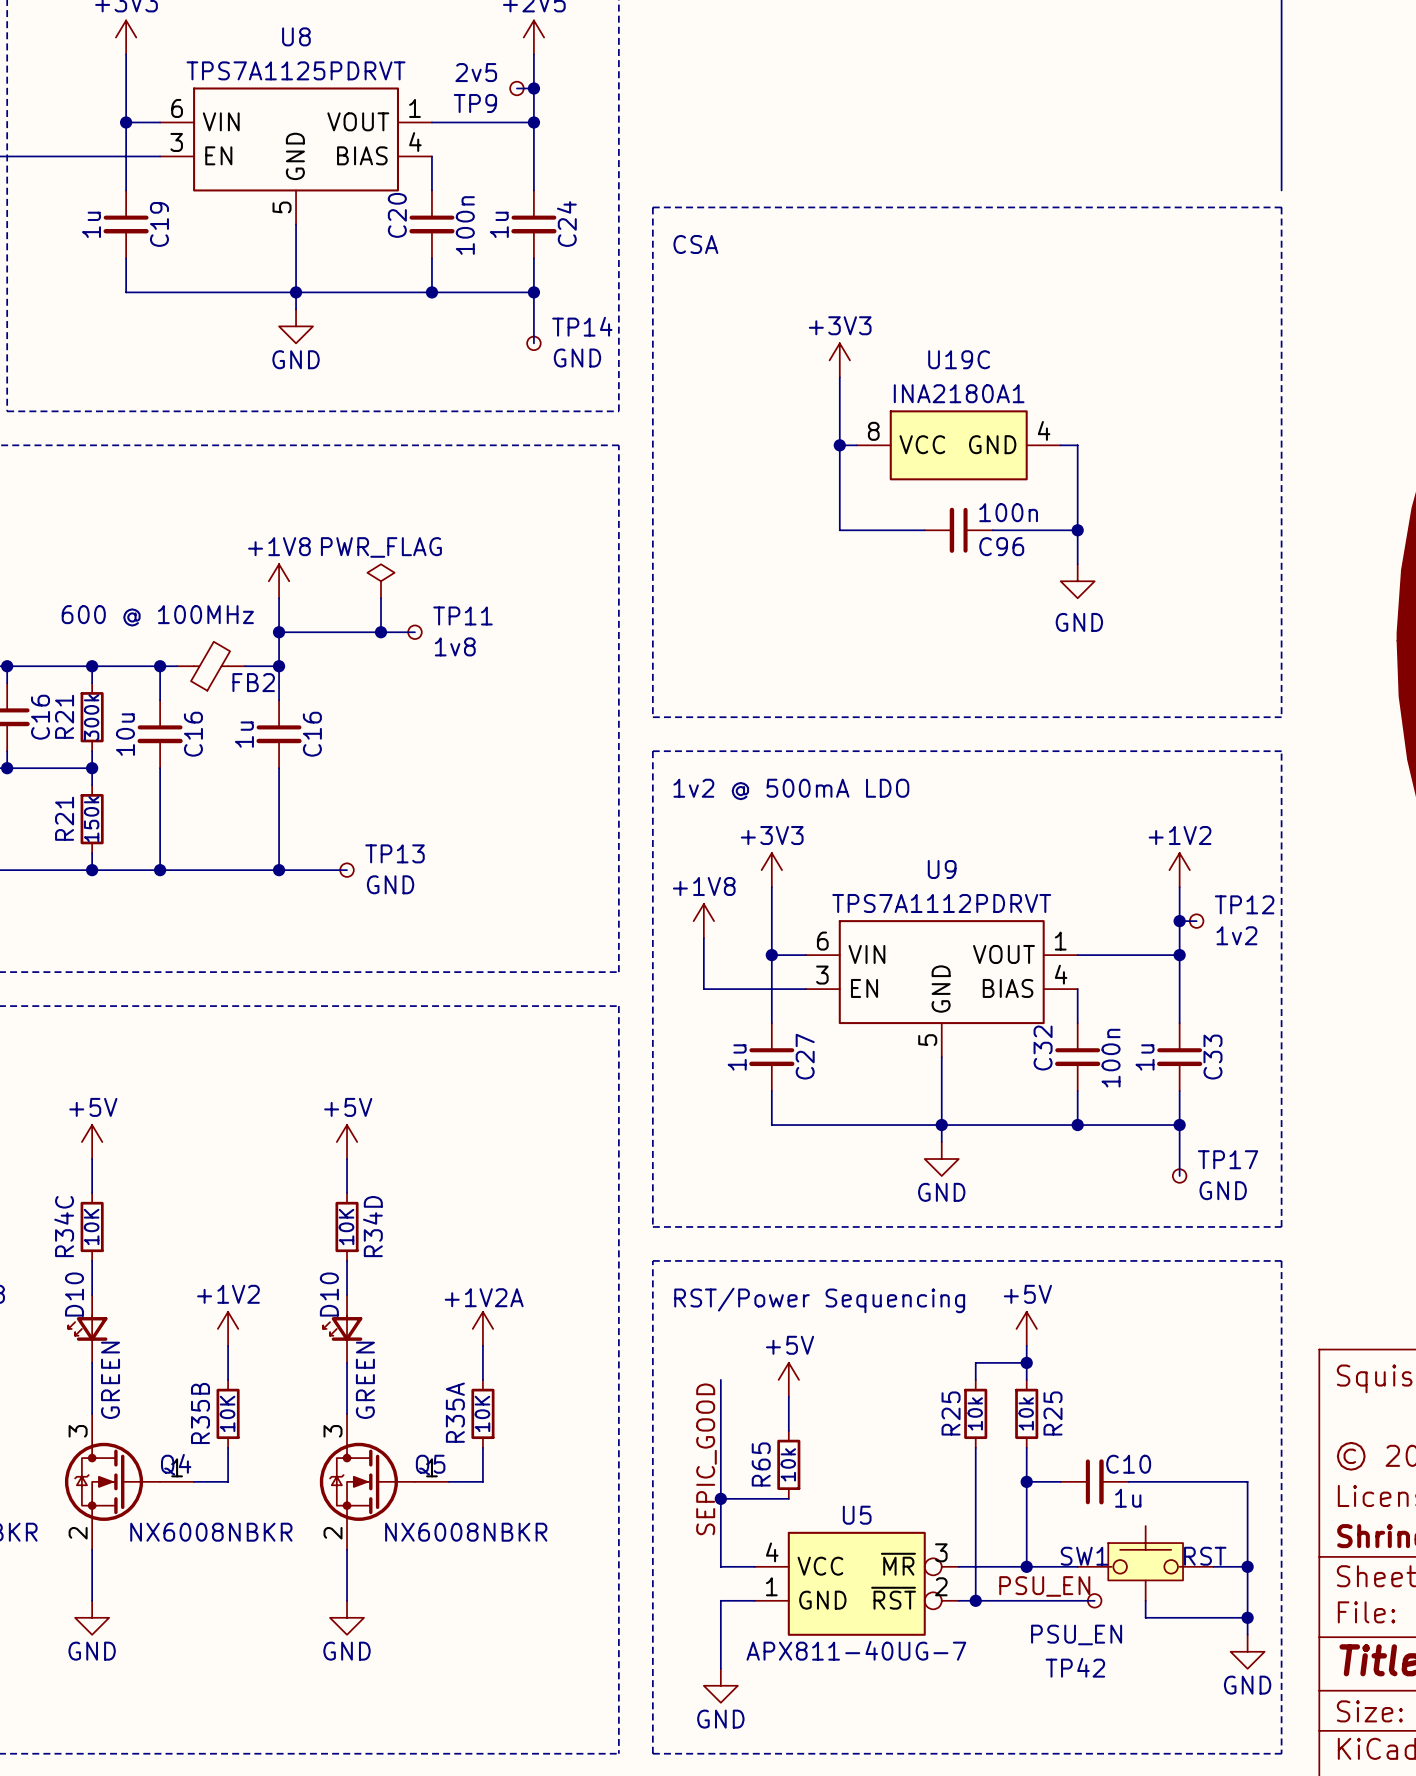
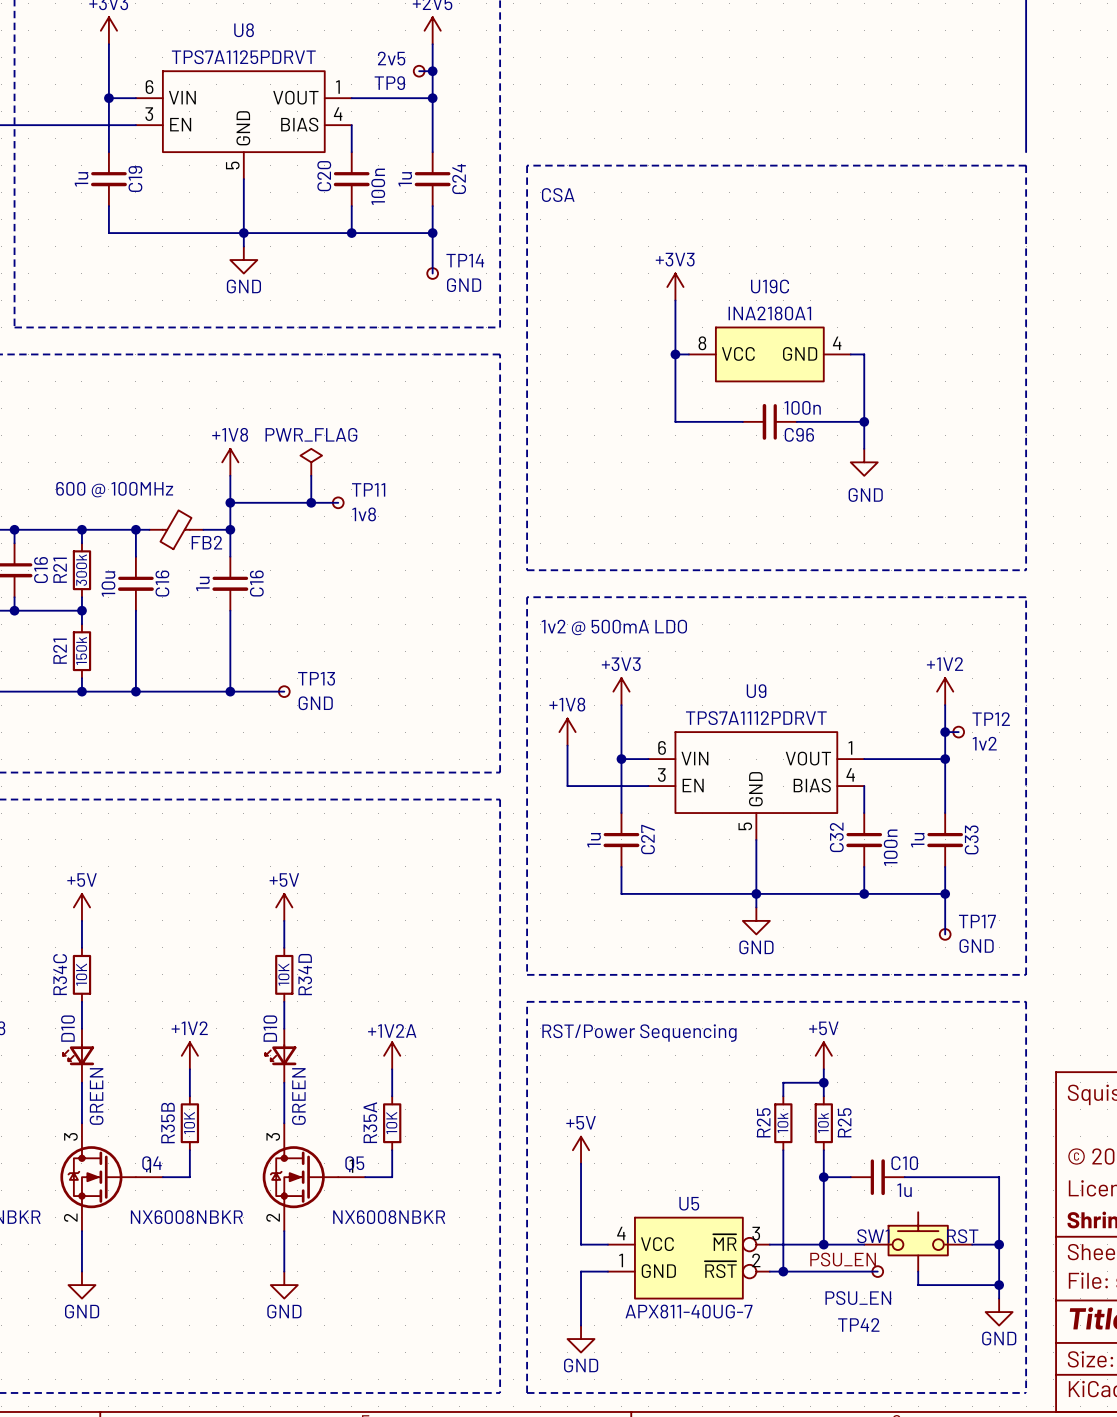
wire: (720, 1379) (720, 1464) -> none
power symbol position: +5V (788, 1379) -> +5V (581, 1150)
wire: (788, 1396) (788, 1430) -> none
label: SEPIC_GOOD (706, 1459) -> none
R65: 10k (788, 1464) -> none
wire: (720, 1498) (788, 1498) -> none
junction: (720, 1498) -> none

